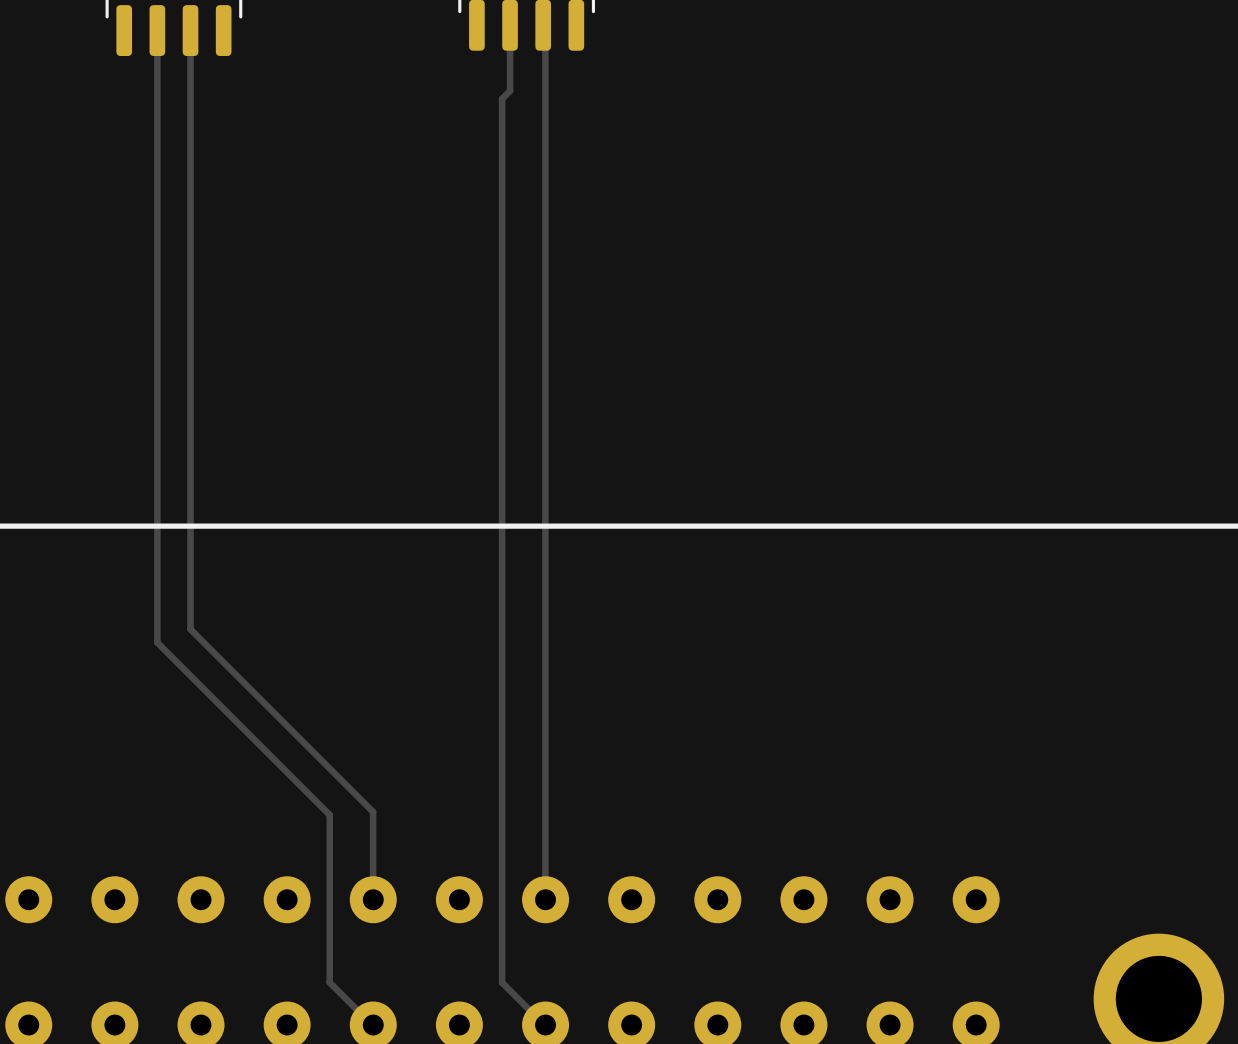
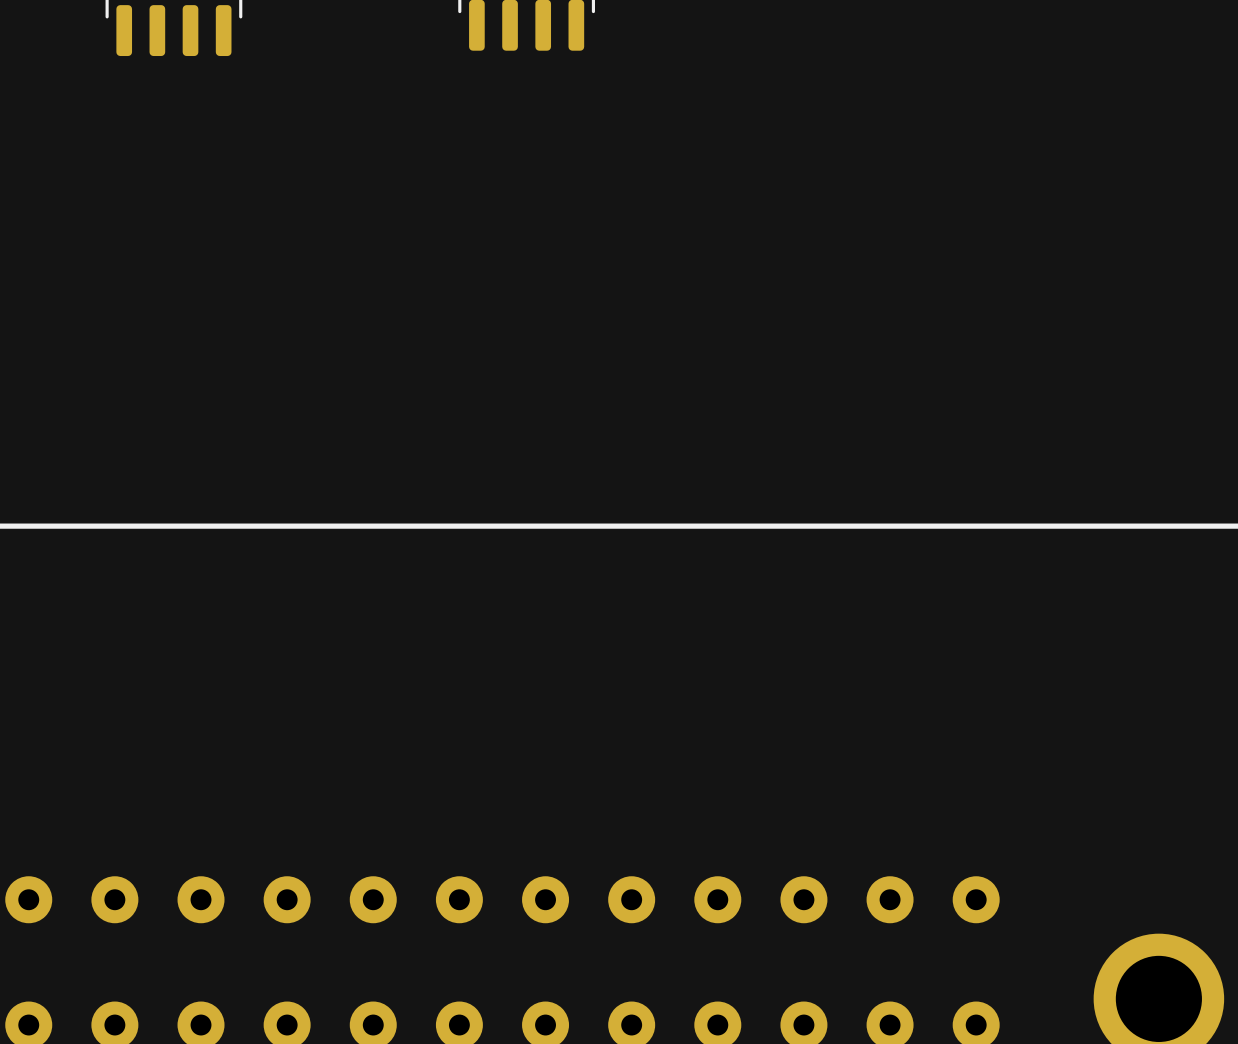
track: (510, 25) (510, 90) (502, 98) (502, 982) (545, 1025) -> none
track: (543, 25) (545, 27) (545, 900) -> none
track: (157, 30) (157, 642) (329, 814) (329, 982) (373, 1025) -> none
track: (190, 30) (190, 629) (373, 811) (373, 900) -> none

